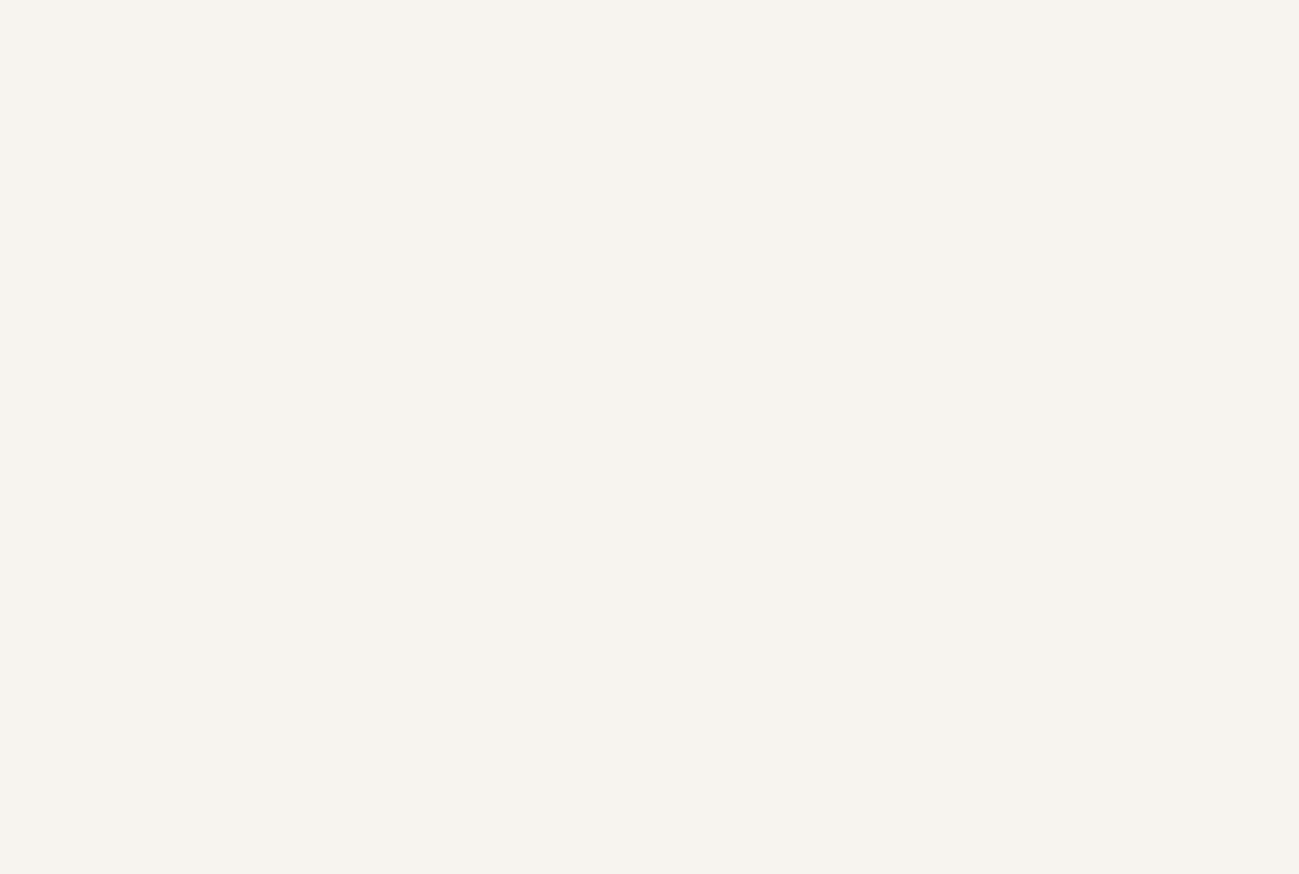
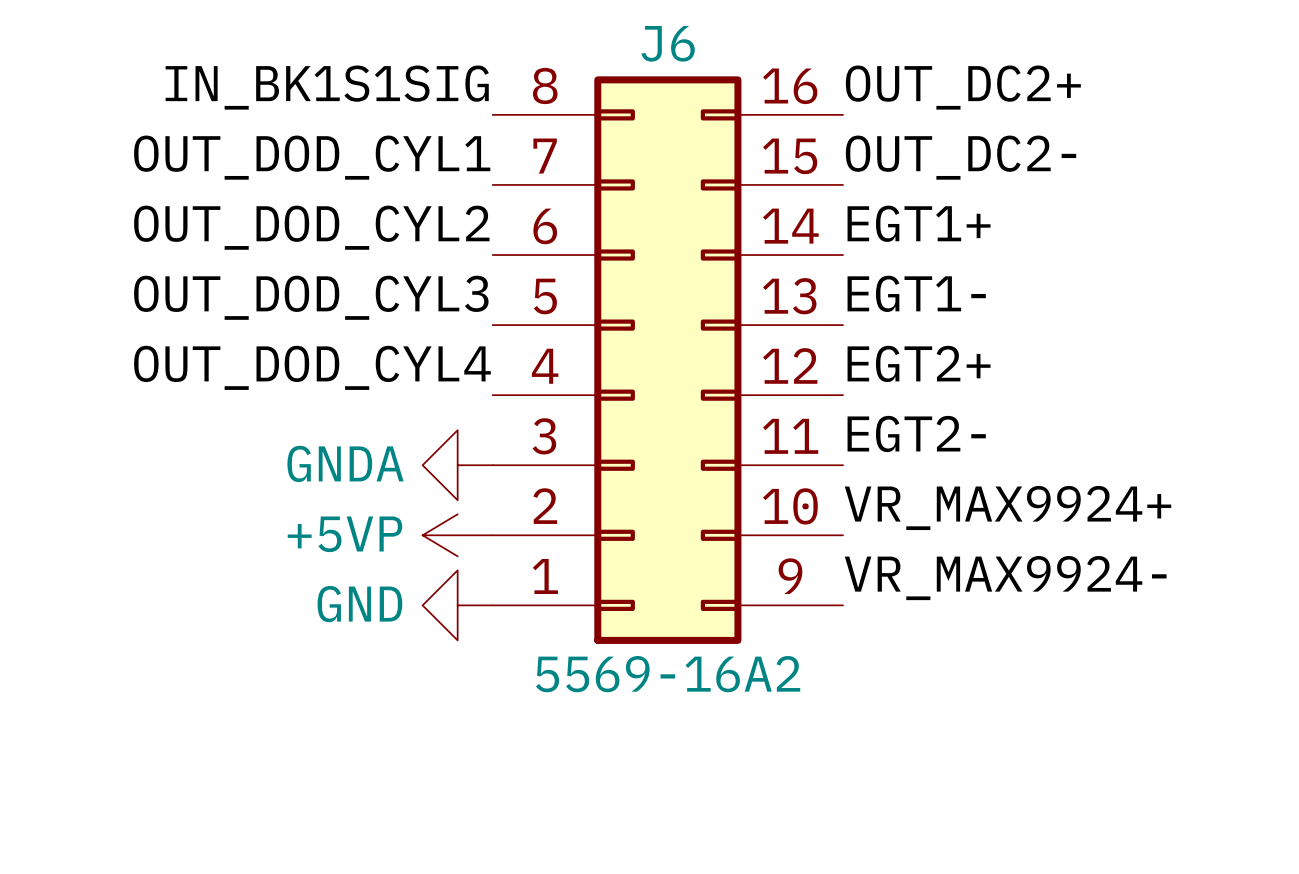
label: none -> IN_BK1S1SIG (327, 87)
label: none -> OUT_DC2+ (963, 87)
label: none -> OUT_DOD_CYL1 (312, 157)
label: none -> OUT_DC2- (961, 157)
label: none -> EGT1+ (919, 223)
label: none -> OUT_DOD_CYL2 (311, 227)
label: none -> EGT1- (916, 293)
label: none -> OUT_DOD_CYL3 (311, 297)
J6: none -> 5569-16A2 (667, 360)
label: none -> EGT2+ (919, 363)
label: none -> OUT_DOD_CYL4 (312, 367)
label: none -> EGT2- (916, 433)
power symbol: none -> GNDA (457, 465)
label: none -> VR_MAX9924+ (1008, 507)
power symbol: none -> +5VP (457, 535)
label: none -> VR_MAX9924- (1005, 578)
power symbol: none -> GND (457, 605)

